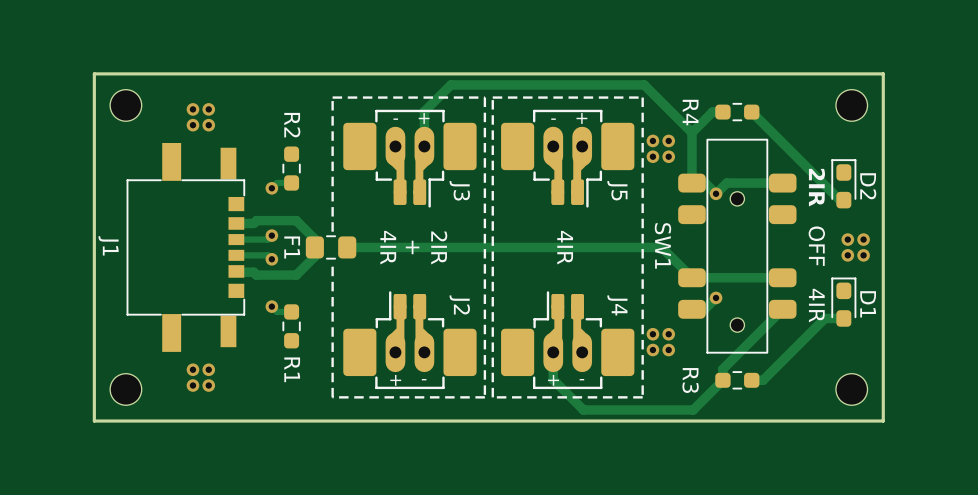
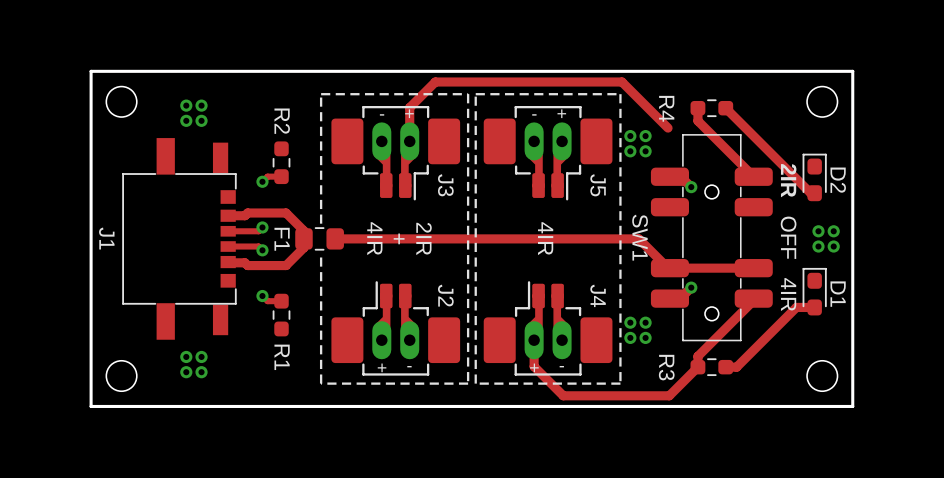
track: (722, 112) (712, 112) (691, 132) (691, 183) -> (697, 108) (697, 120) (753, 176)
SW1 footprint: [678, 138, 797, 354] -> [650, 134, 773, 342]
track: (782, 183) (726, 183) (716, 193) -> none

